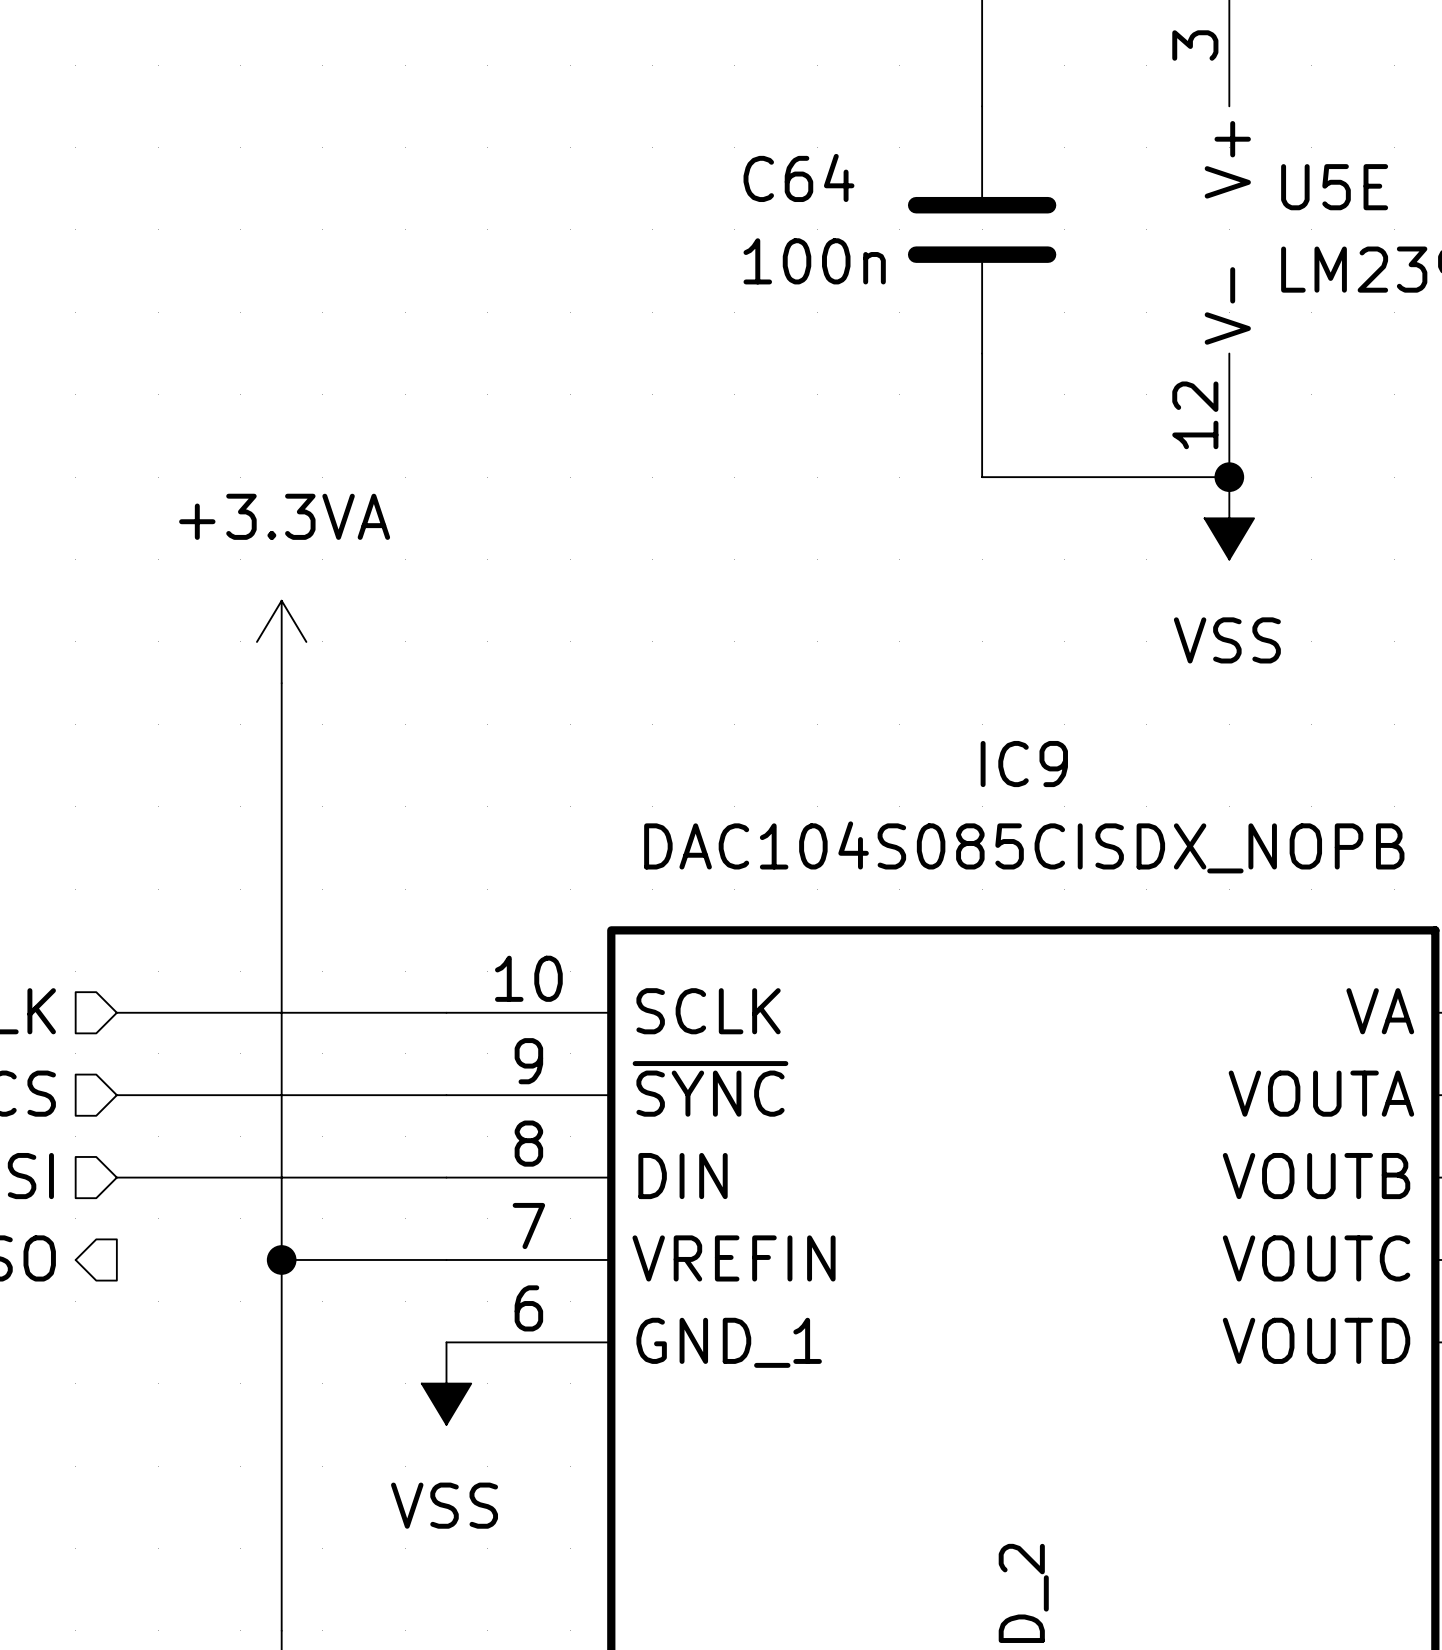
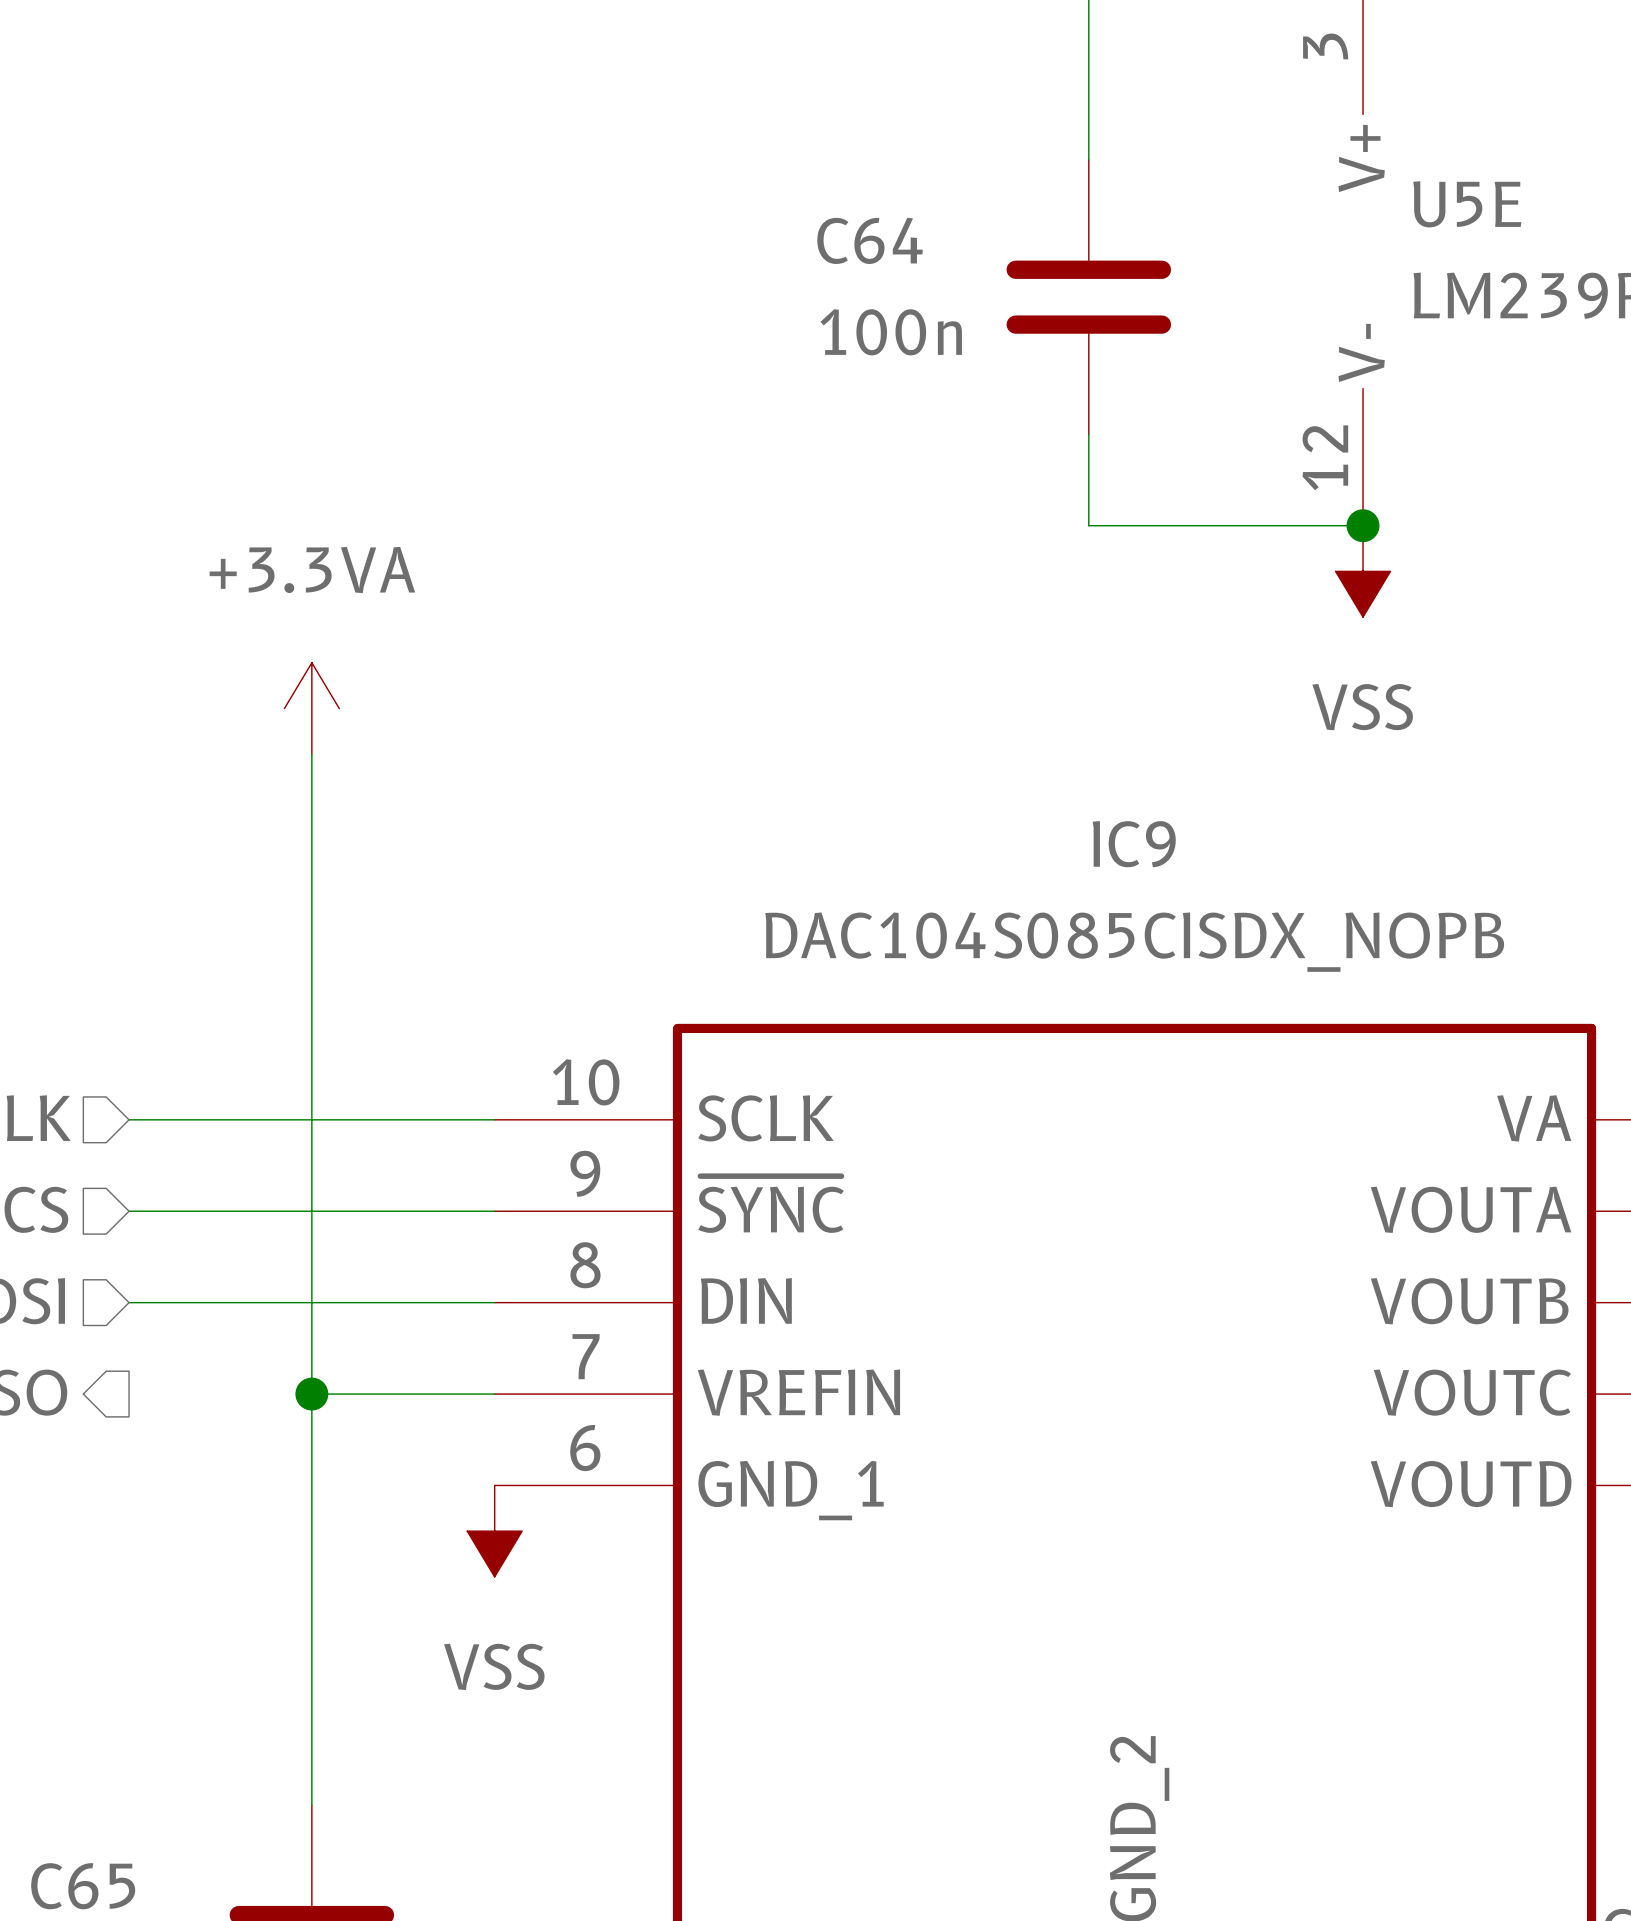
C64 position: (982, 229) -> (1088, 297)

